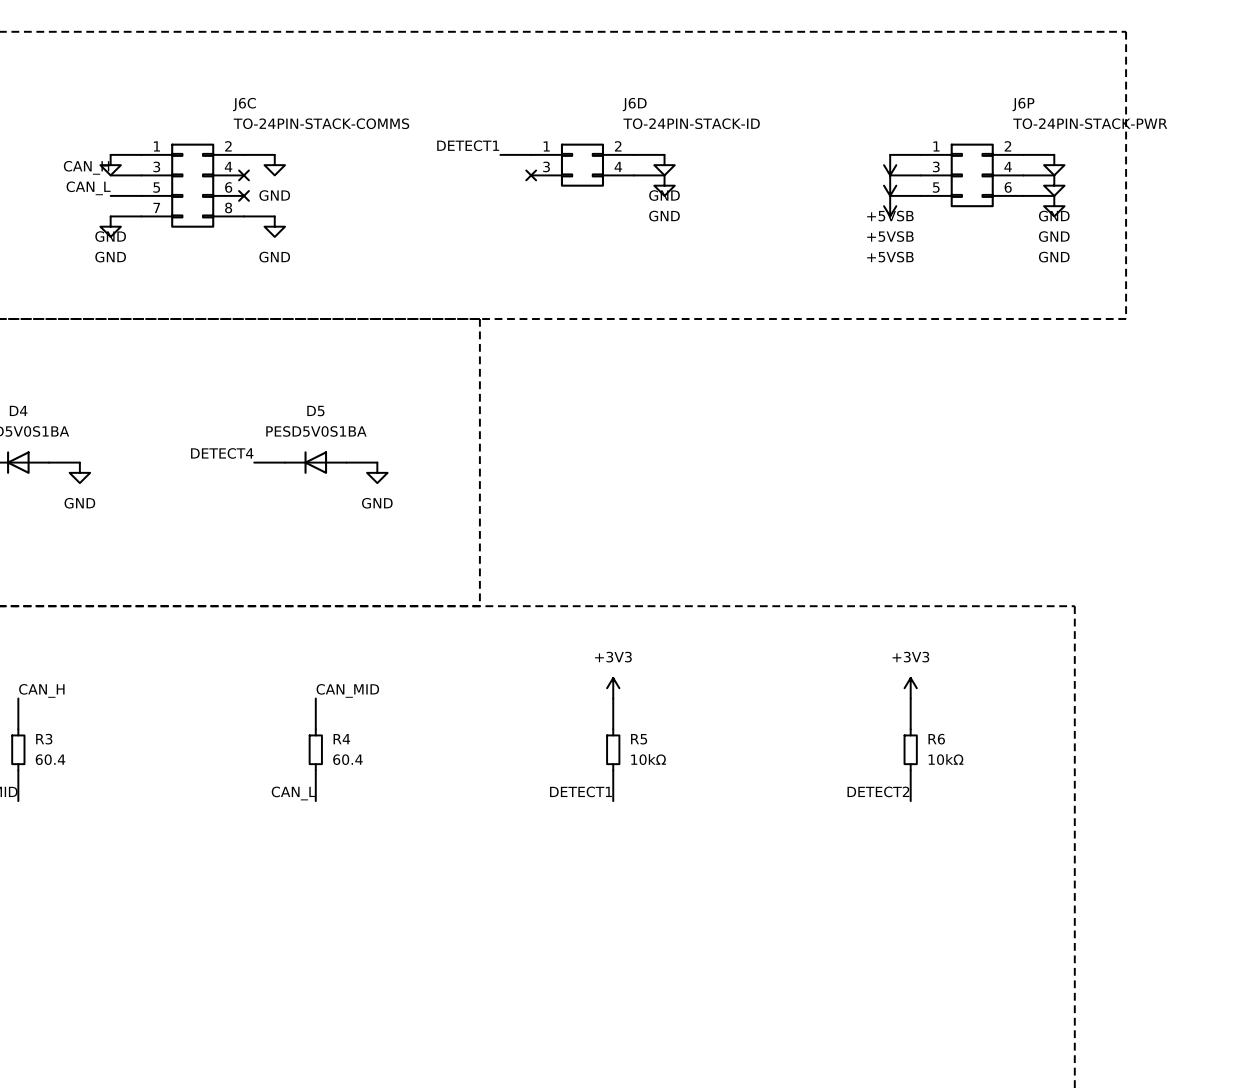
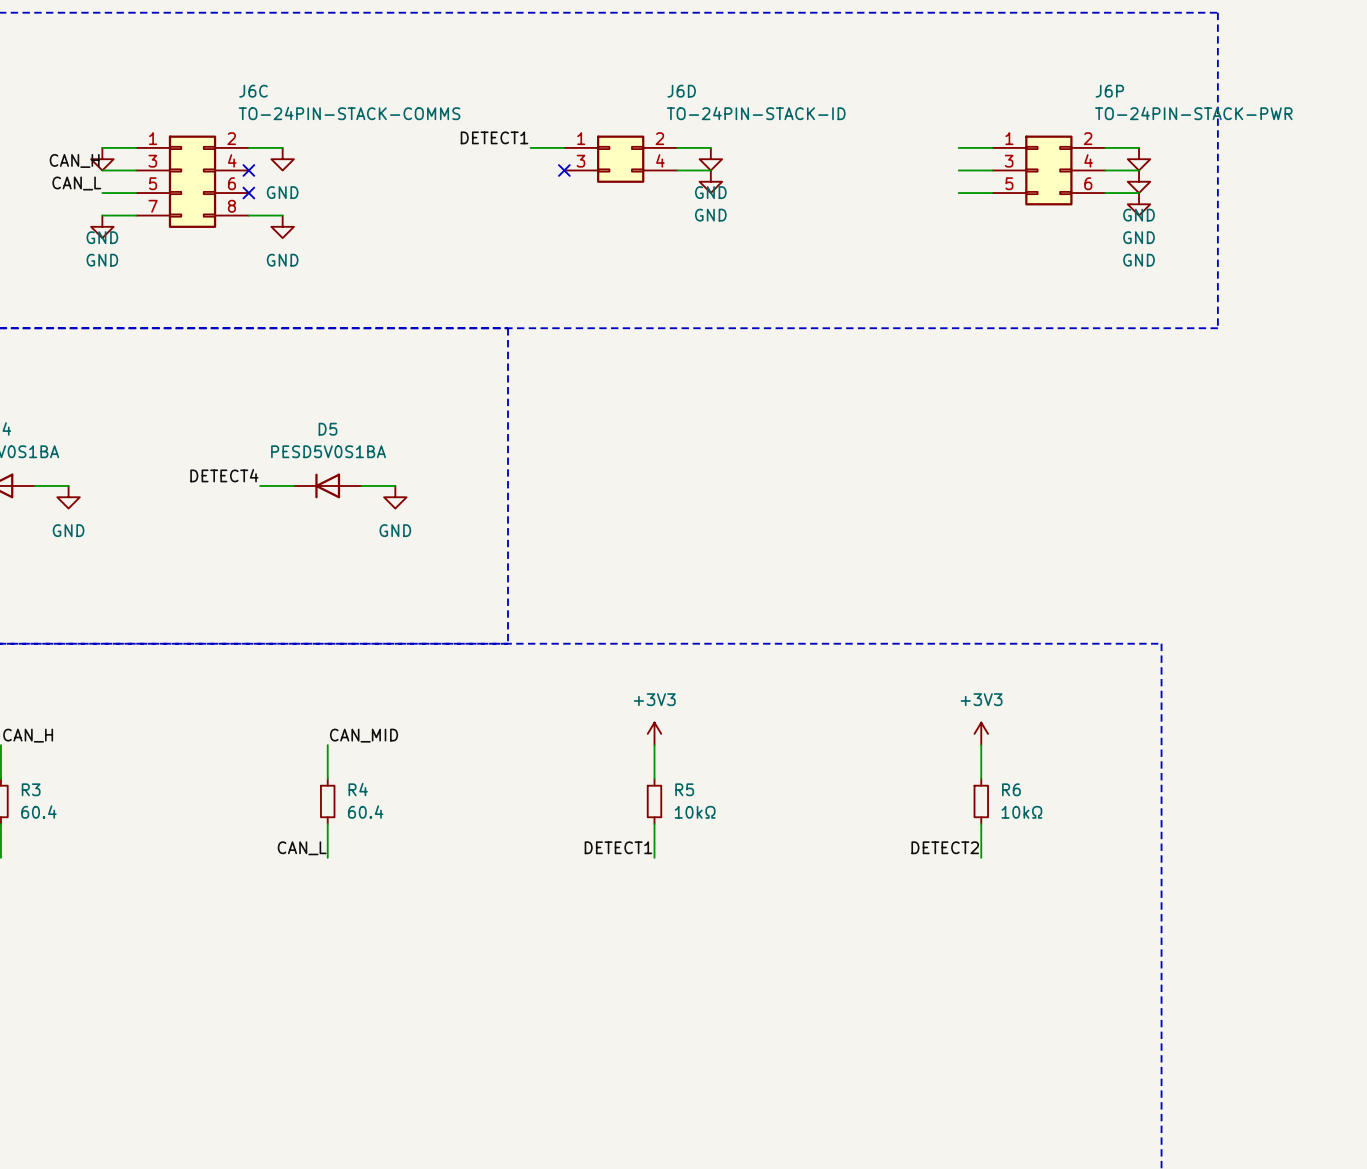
power symbol: +5VSB (890, 165) -> none
power symbol: +5VSB (890, 185) -> none
power symbol: +5VSB (890, 206) -> none

